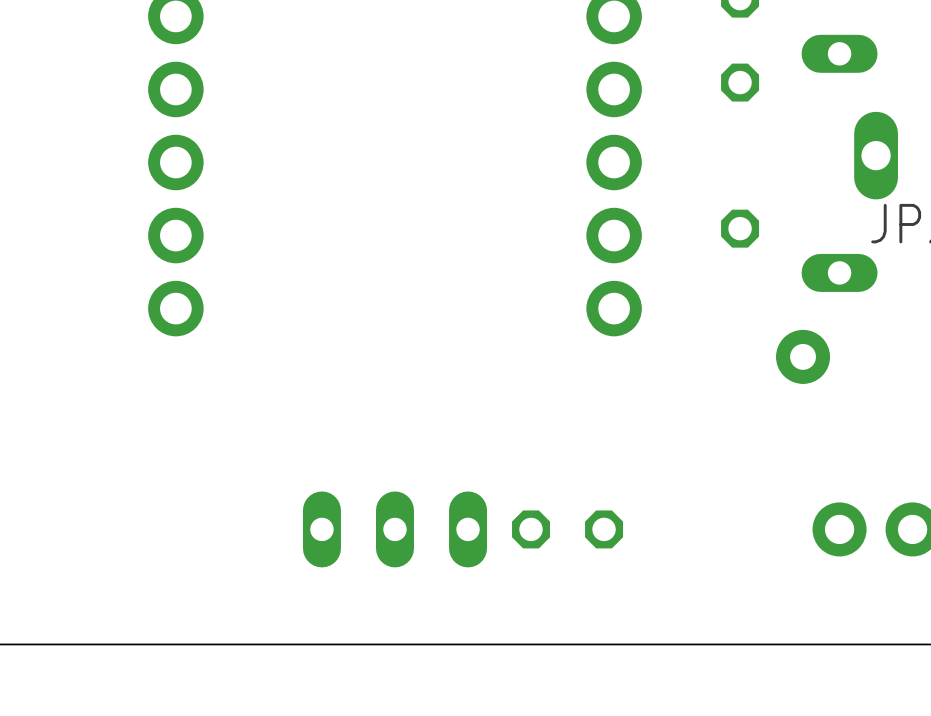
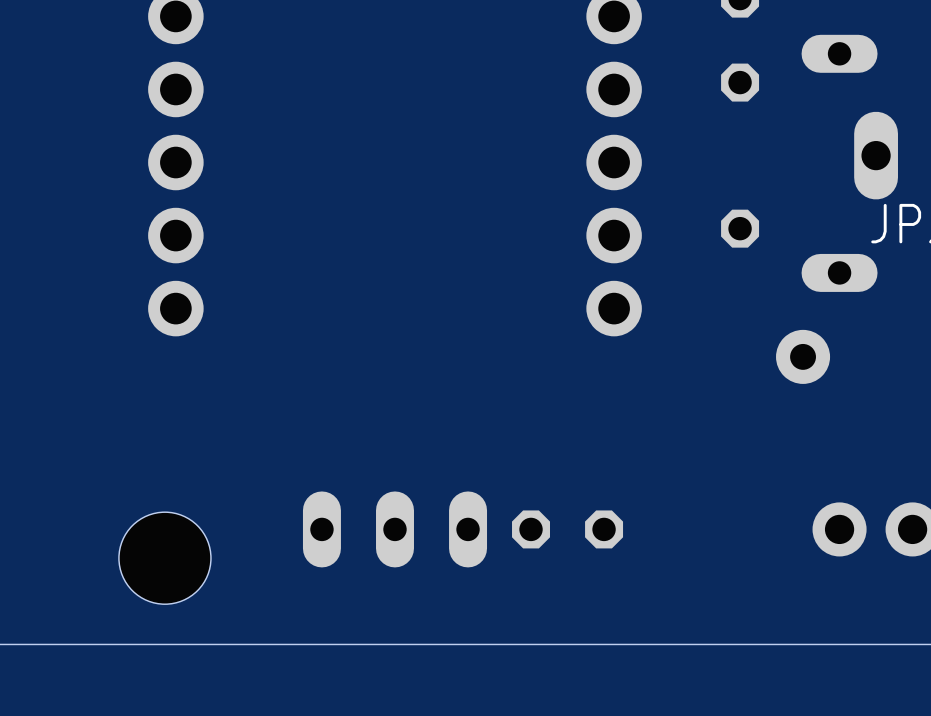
hole: none -> (164, 558)

